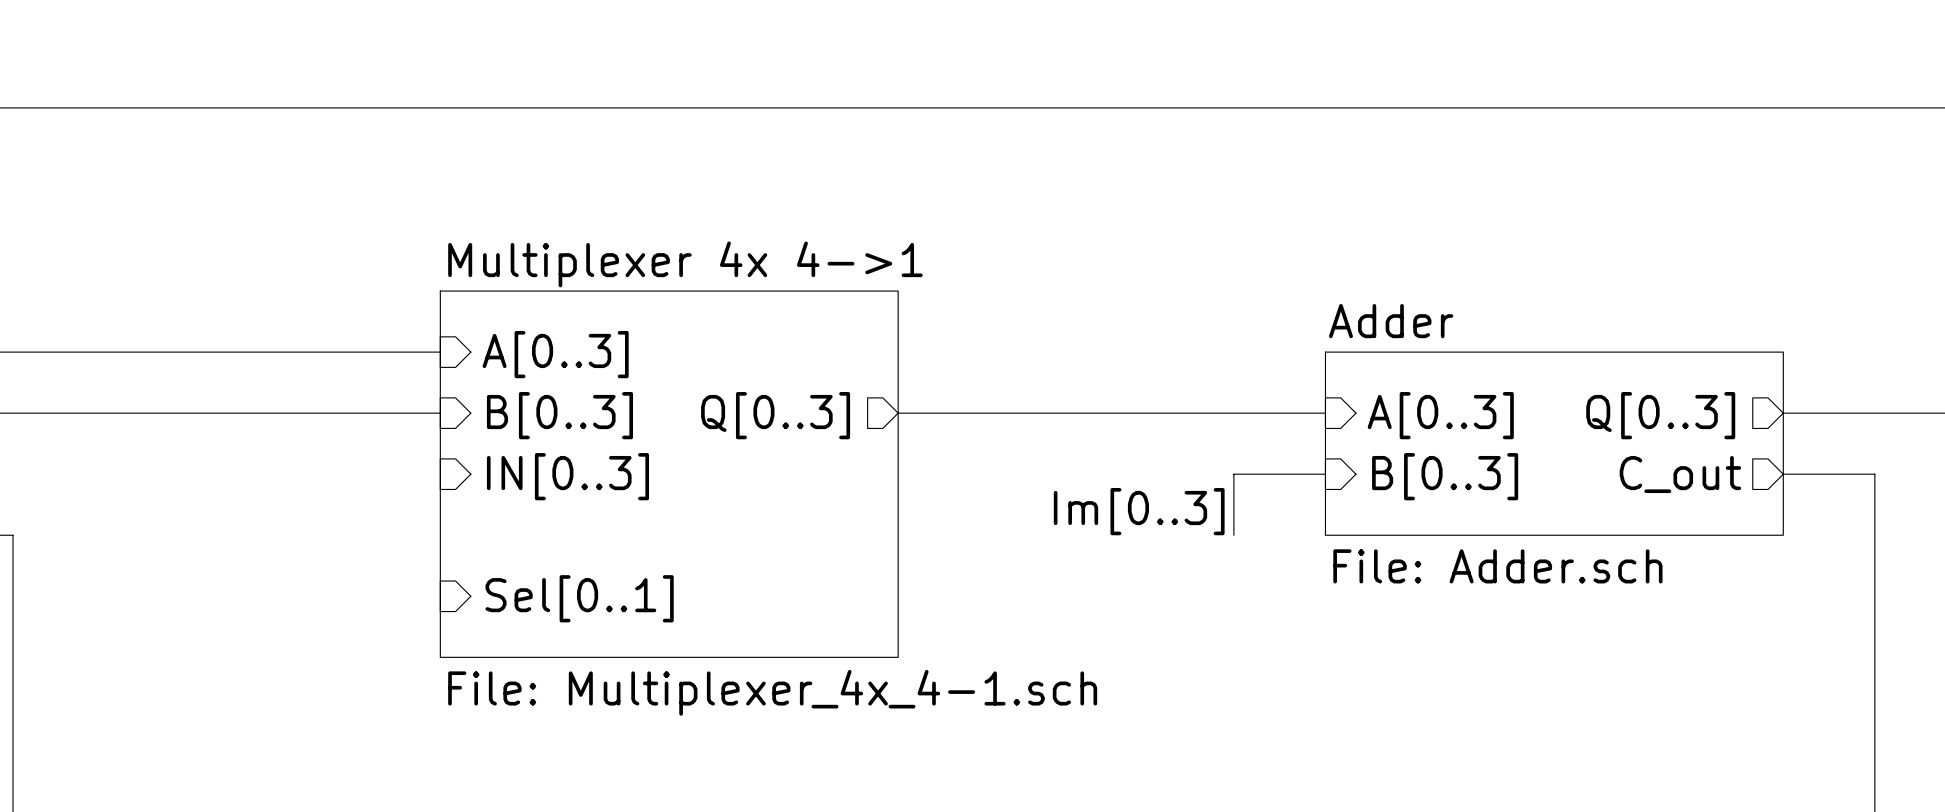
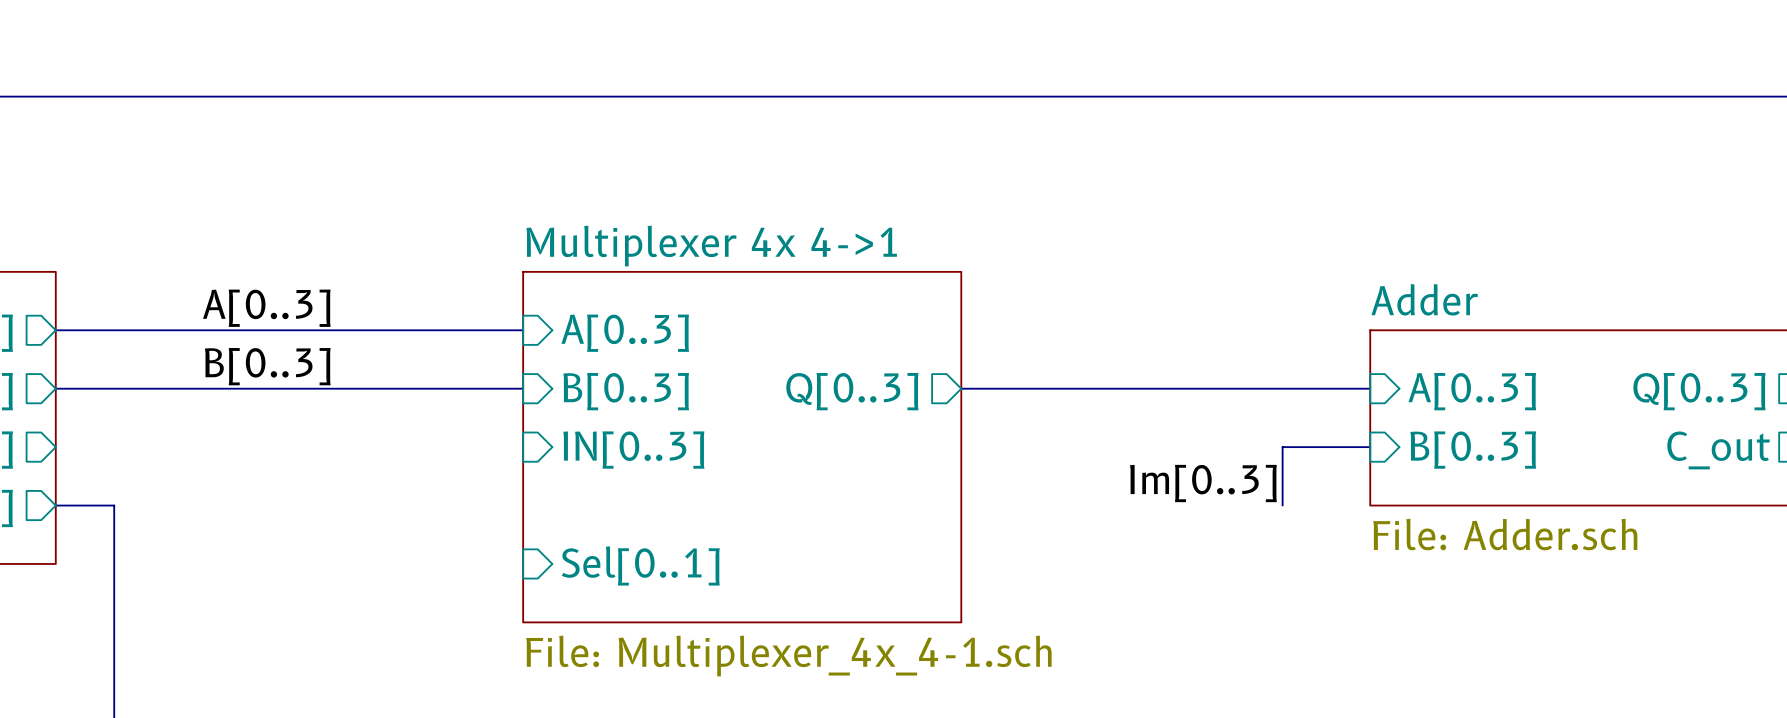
label: none -> A[0..3] (266, 308)
label: none -> B[0..3] (267, 366)

